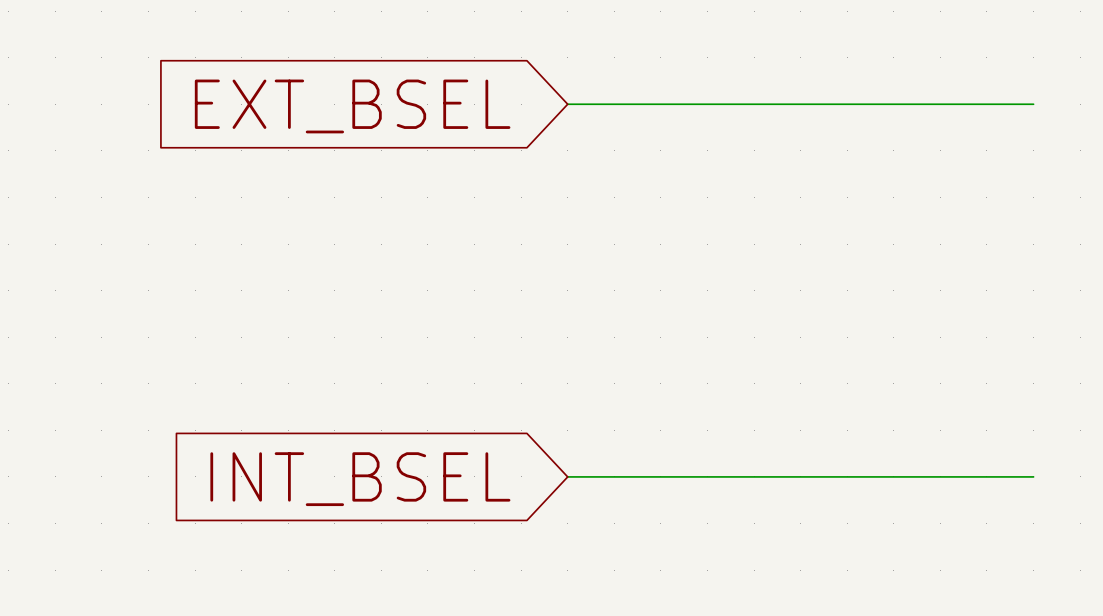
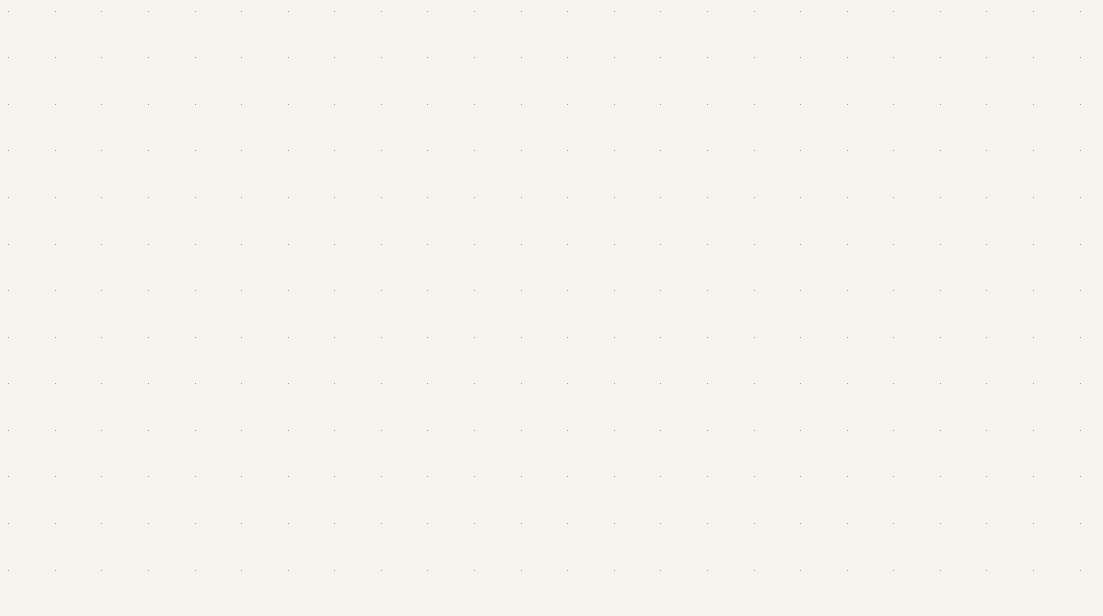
wire: (567, 104) (1033, 104) -> none
global label: EXT_BSEL (352, 106) -> none
wire: (567, 476) (1033, 476) -> none
global label: INT_BSEL (360, 479) -> none

